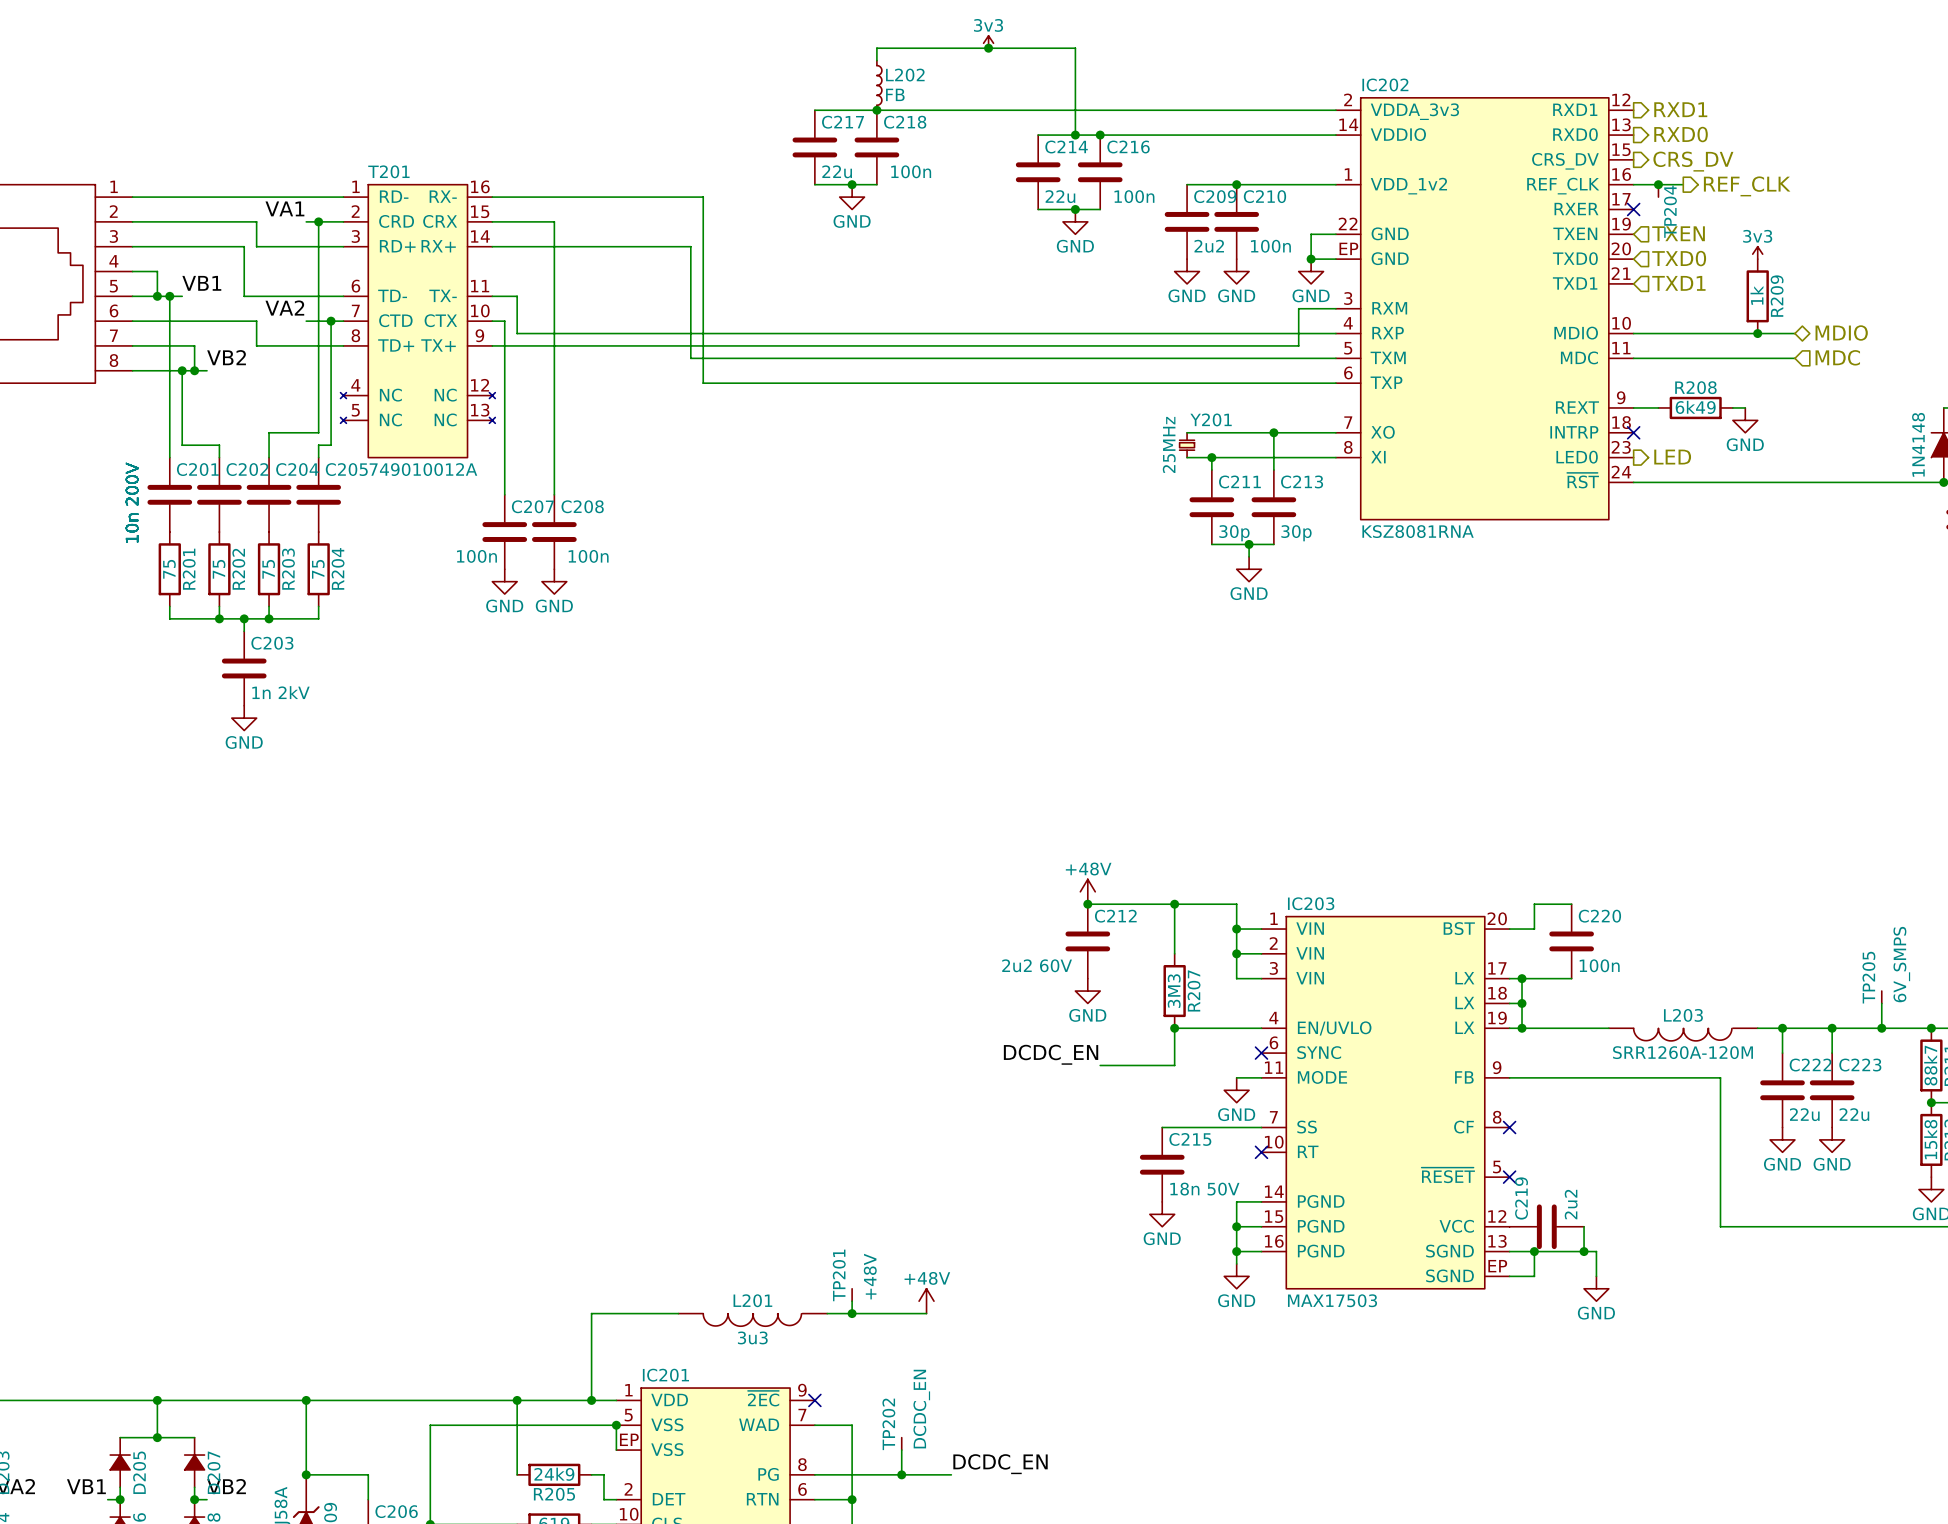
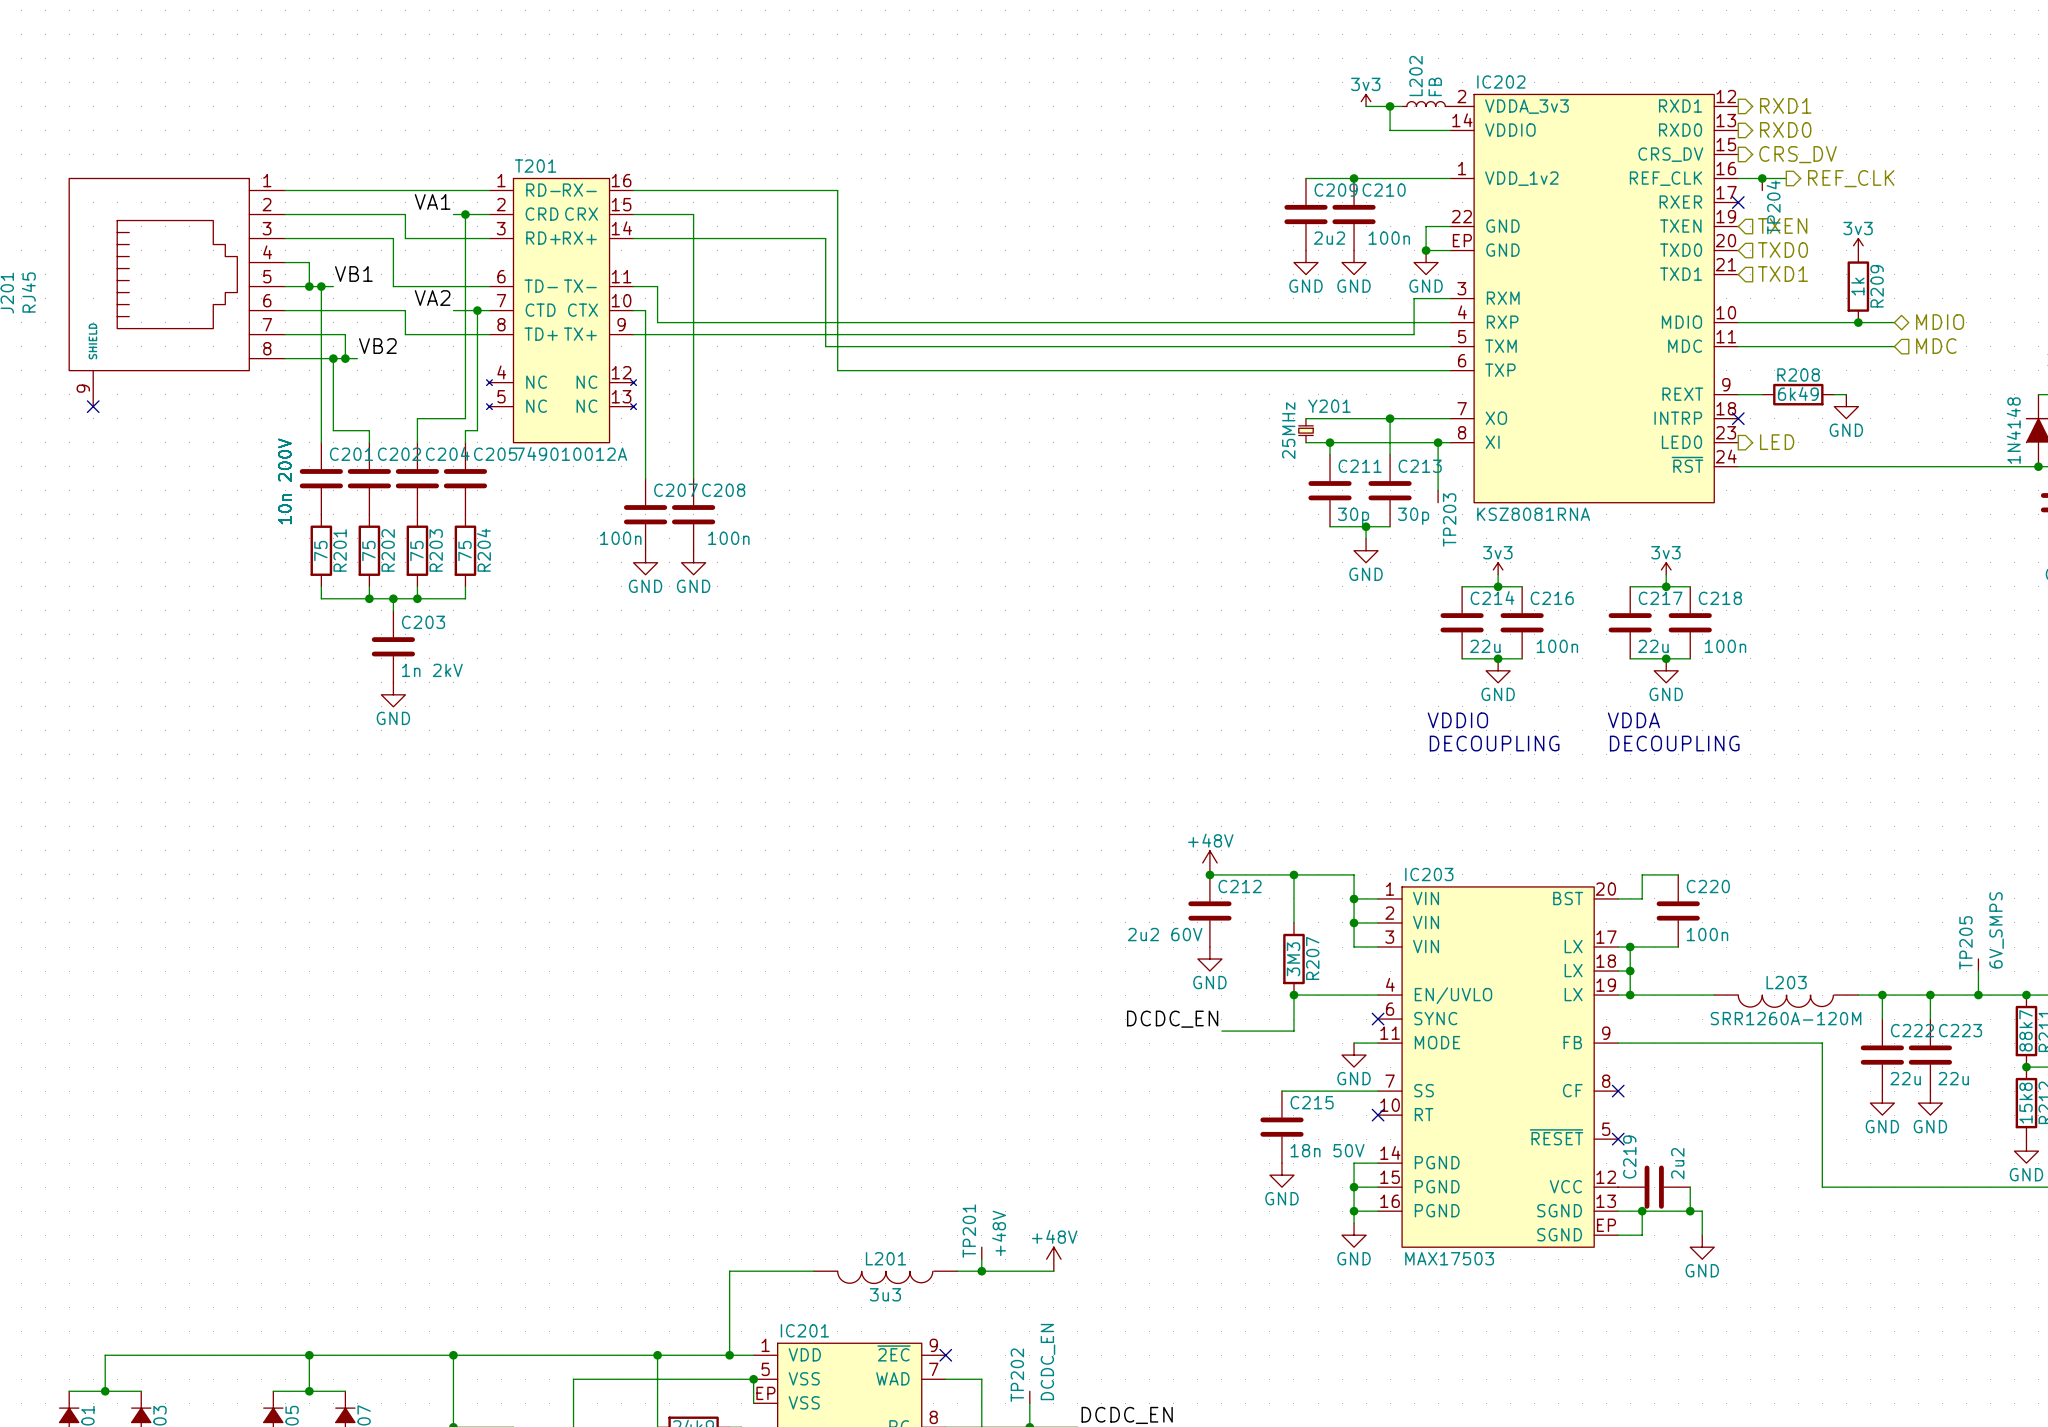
power symbol: 3v3 (988, 42) -> none
junction: (988, 48) -> none
wire: (876, 60) (876, 48) (1075, 48) (1075, 135) -> none
L202 rotation: 0° (879, 85) -> 90° counterclockwise (1426, 104)
L202 position: (879, 85) -> (1426, 104)
power symbol: none -> 3v3 (1366, 100)
wire: (814, 110) (1249, 110) -> none
junction: (876, 110) -> none
junction: none -> (1390, 106)
wire: (1286, 110) (1335, 110) -> none
wire: (1038, 135) (1273, 135) -> (1390, 106) (1390, 130)
junction: (1075, 135) -> none
junction: (1100, 135) -> none
C217 position: (814, 147) -> (1630, 622)
C218 position: (876, 147) -> (1690, 622)
C214 position: (1038, 172) -> (1462, 622)
C216 position: (1100, 172) -> (1522, 622)
wire: (814, 184) (876, 184) -> none
junction: (852, 184) -> none
power symbol: GND (852, 197) -> none
wire: (1038, 209) (1100, 209) -> none
junction: (1075, 209) -> none
power symbol: GND (1075, 221) -> none
wire: none -> (1438, 442) (1438, 490)
junction: none -> (1438, 442)
TP203: none -> (1438, 499)
power symbol: none -> 3v3 (1498, 568)
power symbol: none -> 3v3 (1666, 568)
wire: none -> (1498, 574) (1498, 586)
wire: none -> (1666, 574) (1666, 586)
wire: none -> (1462, 586) (1522, 586)
junction: none -> (1498, 586)
wire: none -> (1630, 586) (1690, 586)
junction: none -> (1666, 586)
wire: none -> (1462, 658) (1522, 658)
junction: none -> (1498, 658)
wire: none -> (1630, 658) (1690, 658)
junction: none -> (1666, 658)
power symbol: none -> GND (1498, 670)
power symbol: none -> GND (1666, 670)
text: none -> VDDIO (1457, 720)
text: none -> VDDA (1633, 720)
text: none -> DECOUPLING (1494, 743)
text: none -> DECOUPLING (1674, 743)

